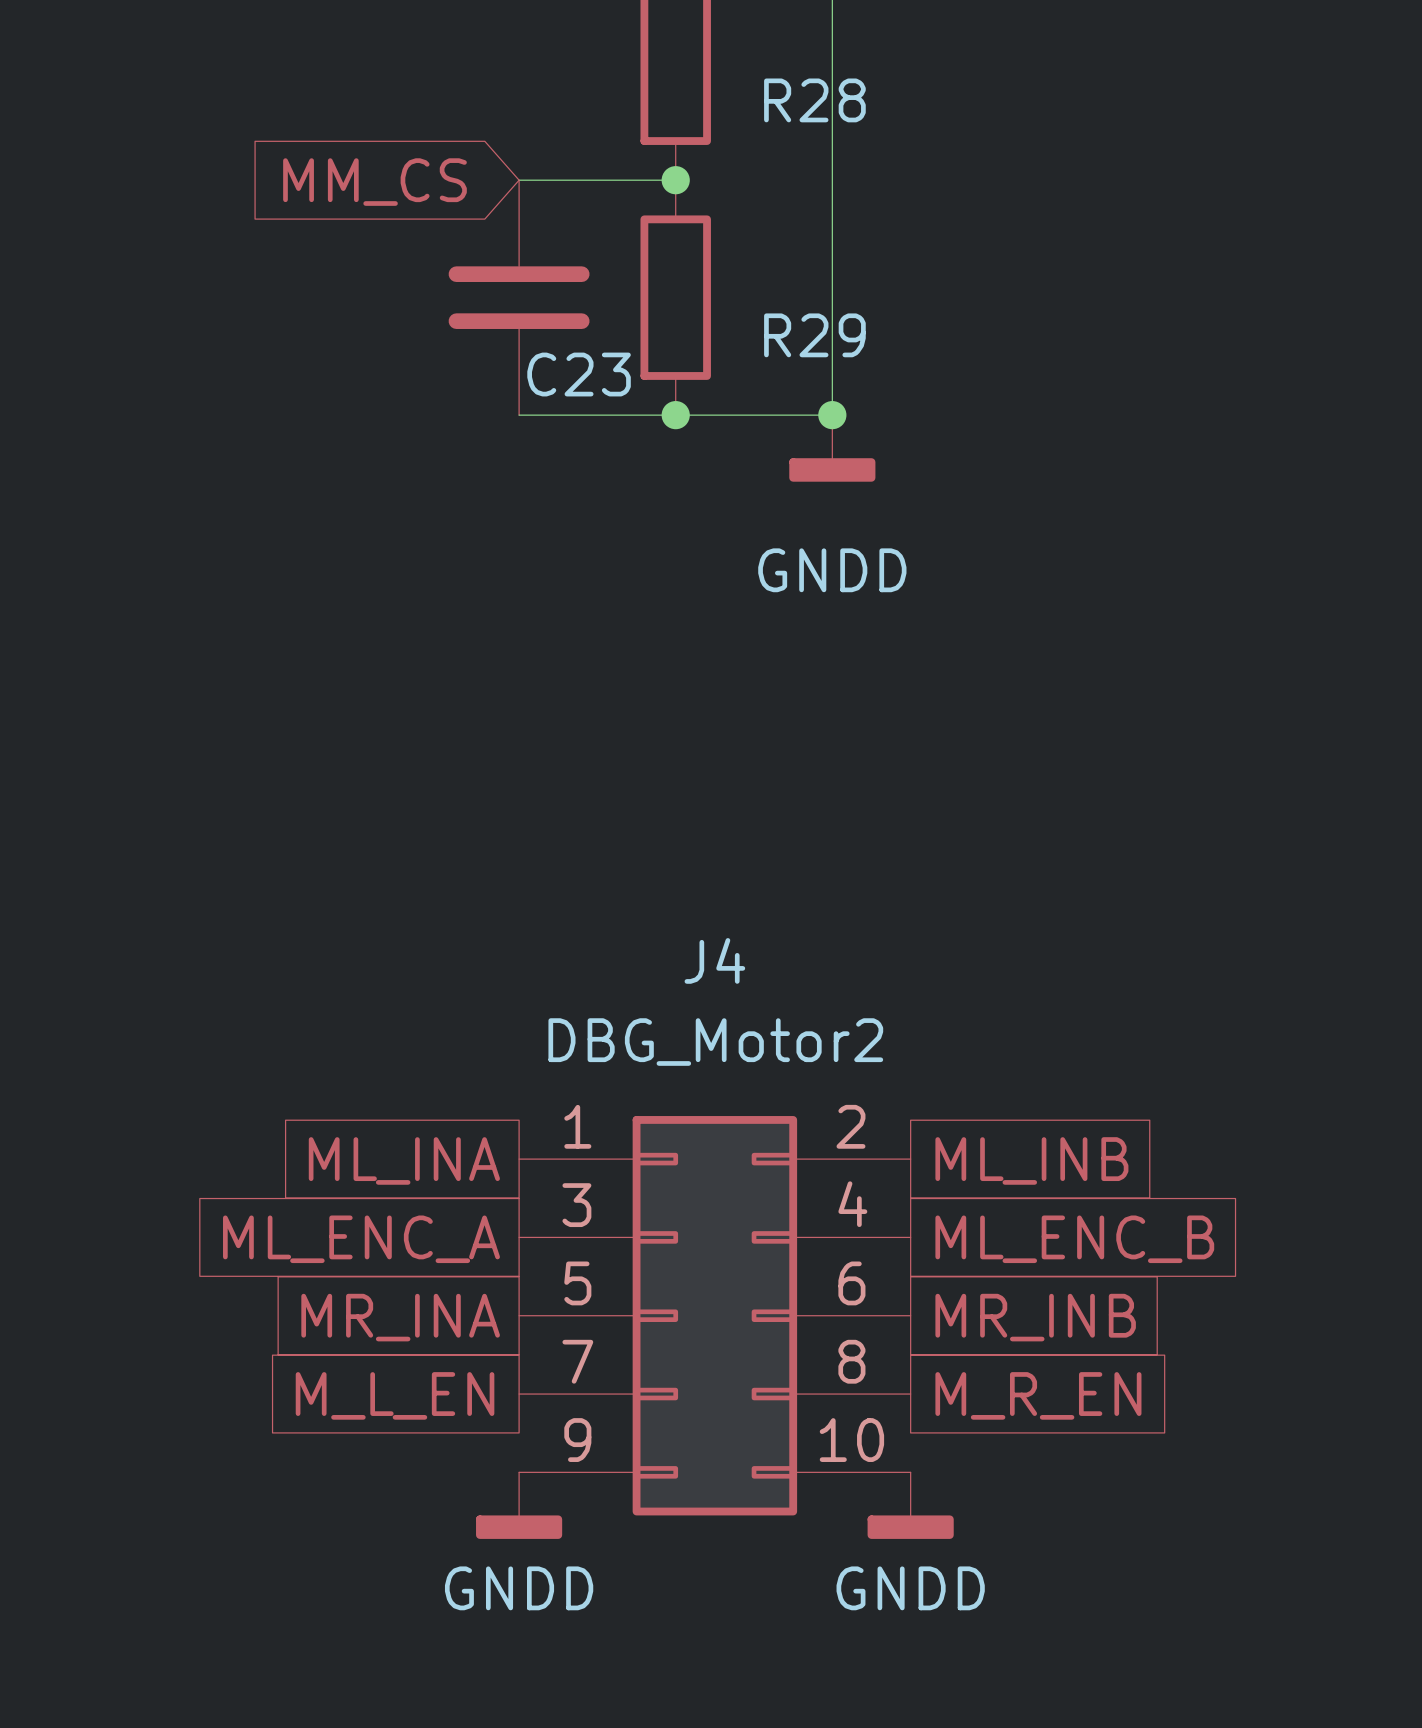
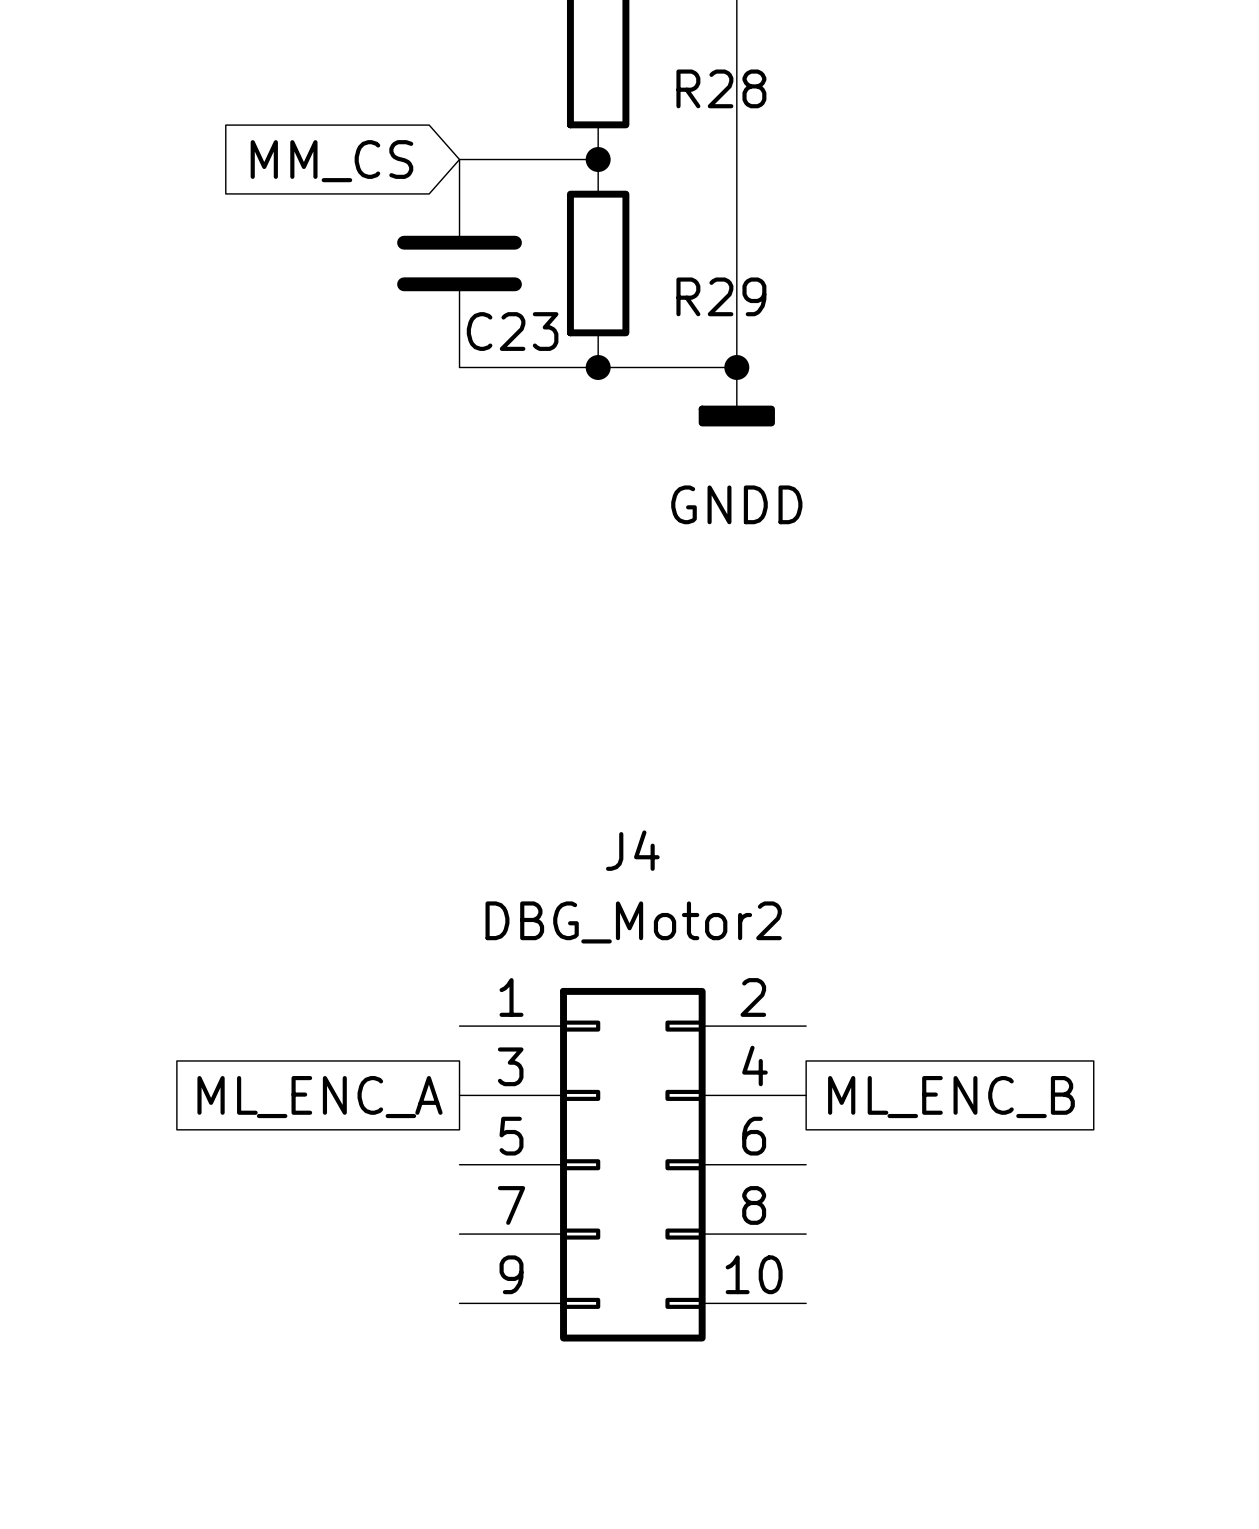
global label: ML_INA (404, 1160) -> none
global label: ML_INB (1031, 1160) -> none
global label: MR_INA (400, 1317) -> none
global label: MR_INB (1035, 1317) -> none
global label: M_L_EN (395, 1395) -> none
global label: M_R_EN (1038, 1395) -> none
power symbol: GNDD (519, 1505) -> none
power symbol: GNDD (910, 1505) -> none

